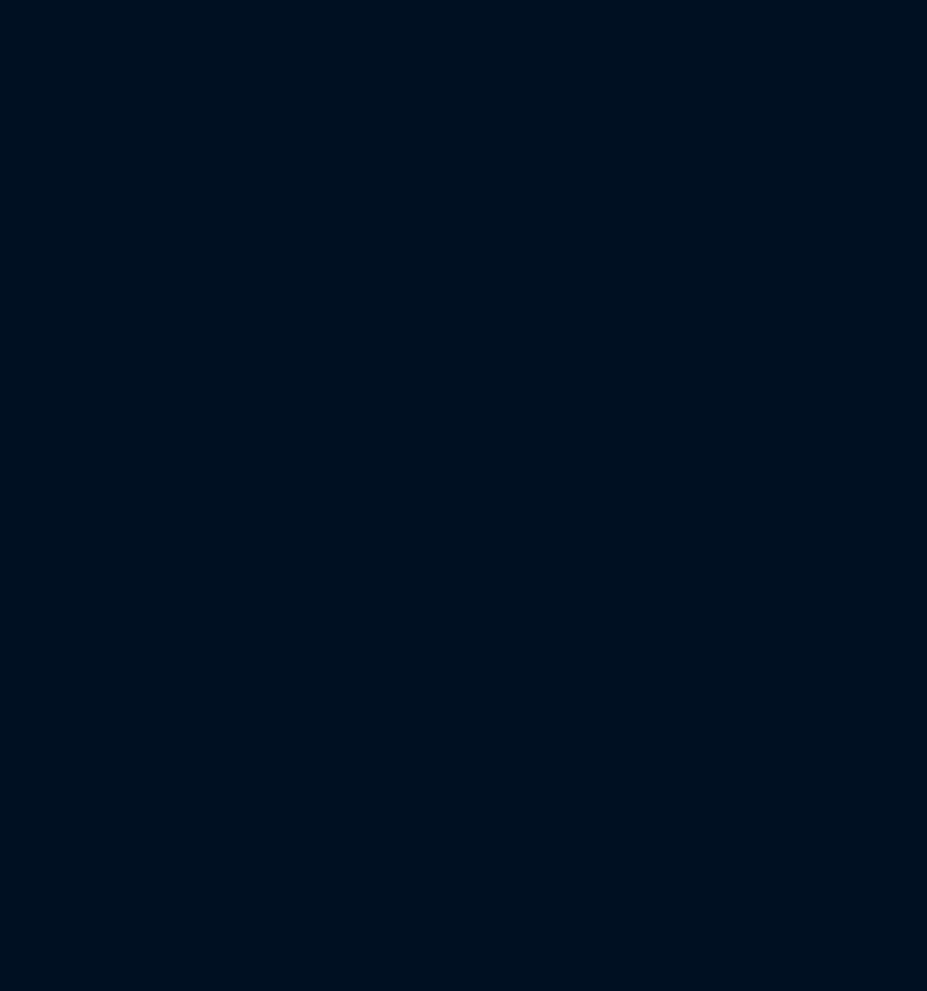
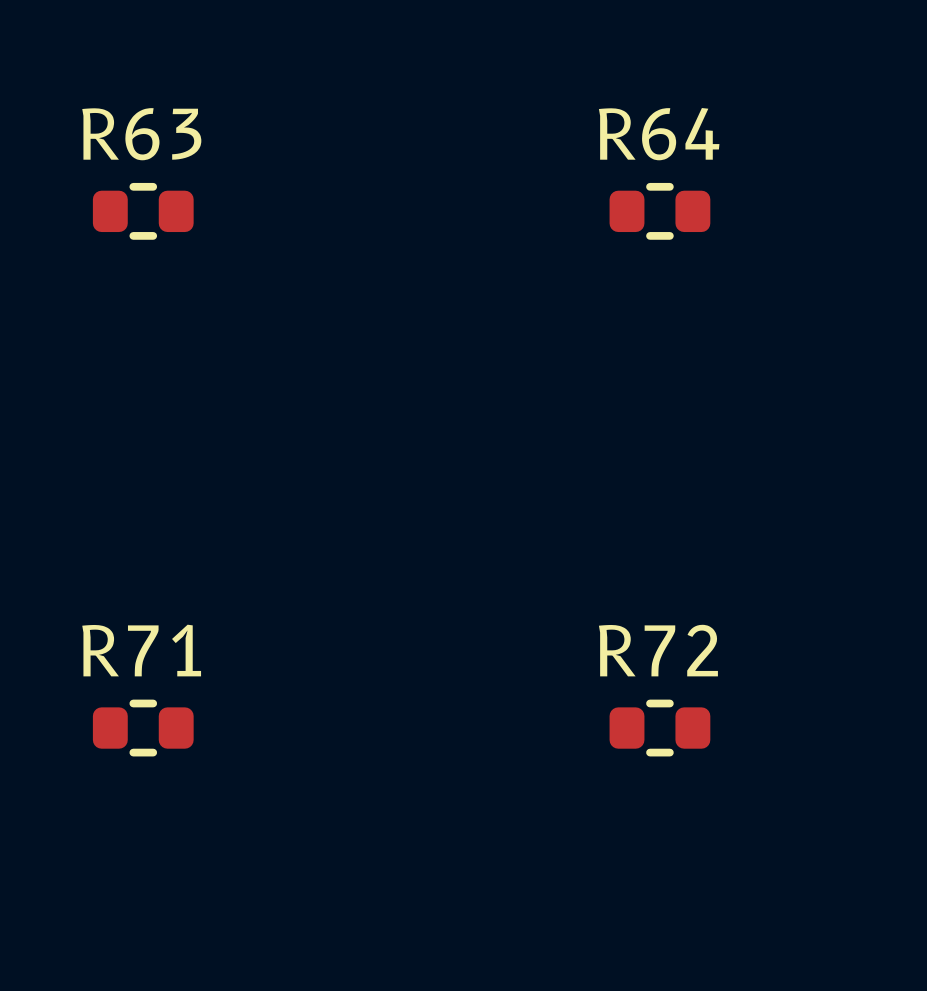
R63: none -> (143, 211)
R64: none -> (659, 211)
R71: none -> (143, 728)
R72: none -> (659, 728)

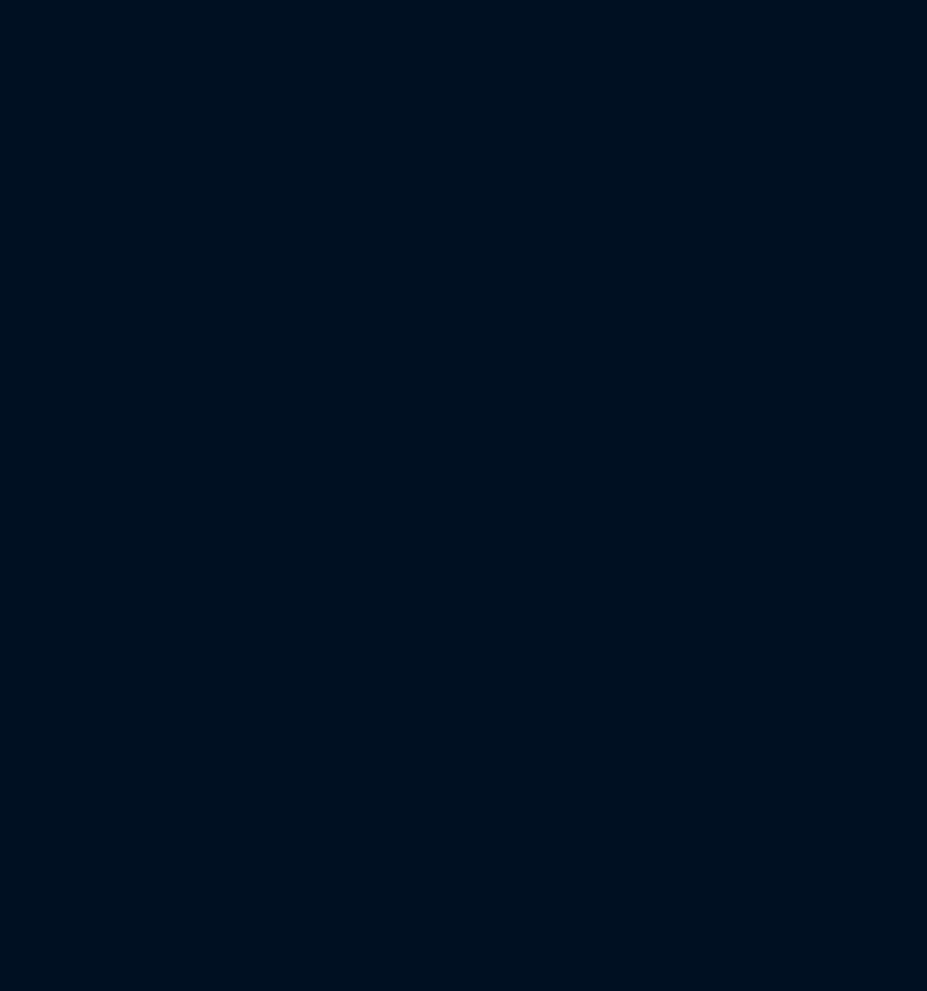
R63: (143, 211) -> none
R64: (659, 211) -> none
R71: (143, 728) -> none
R72: (659, 728) -> none

